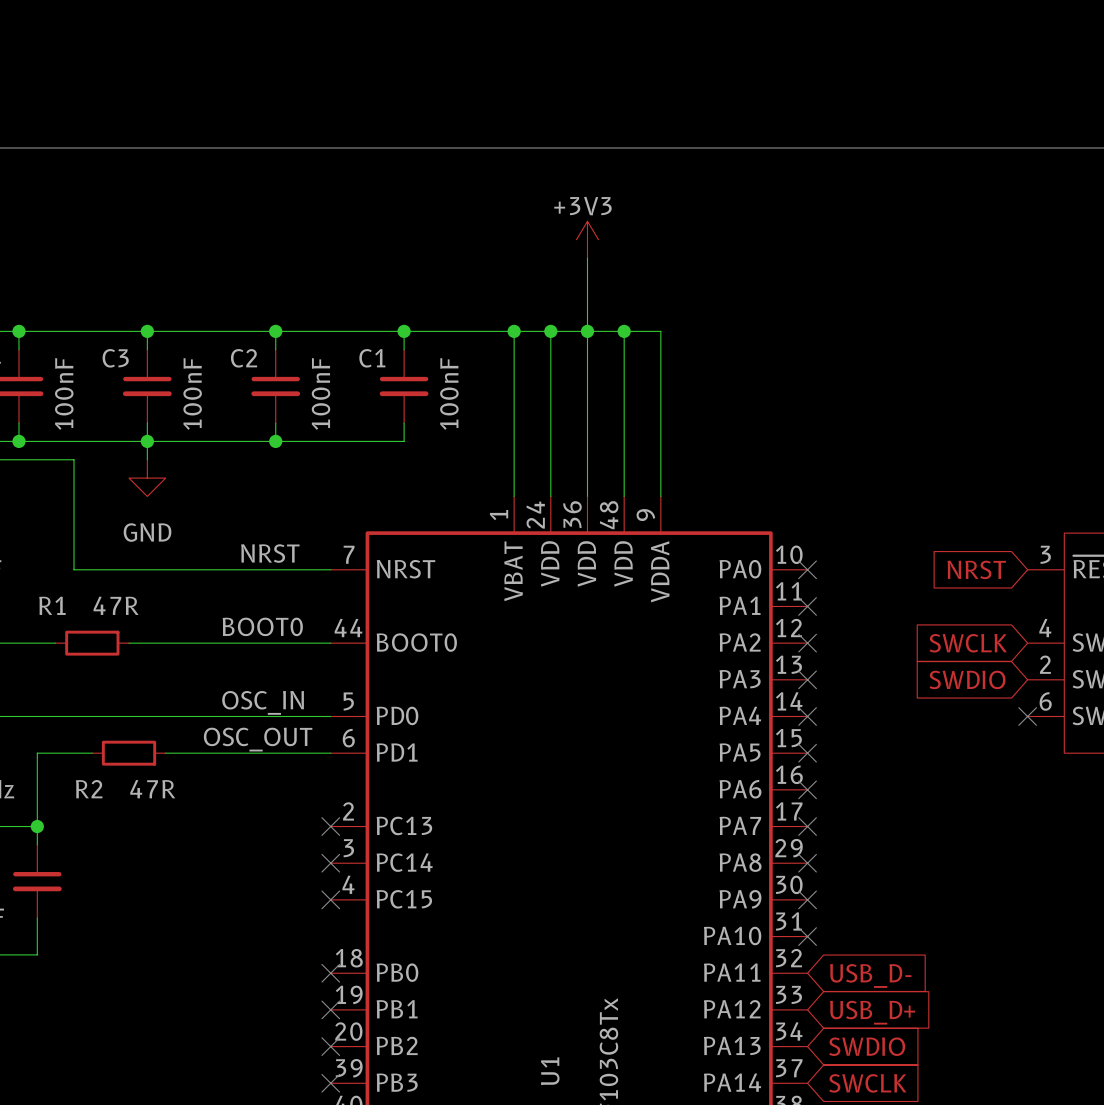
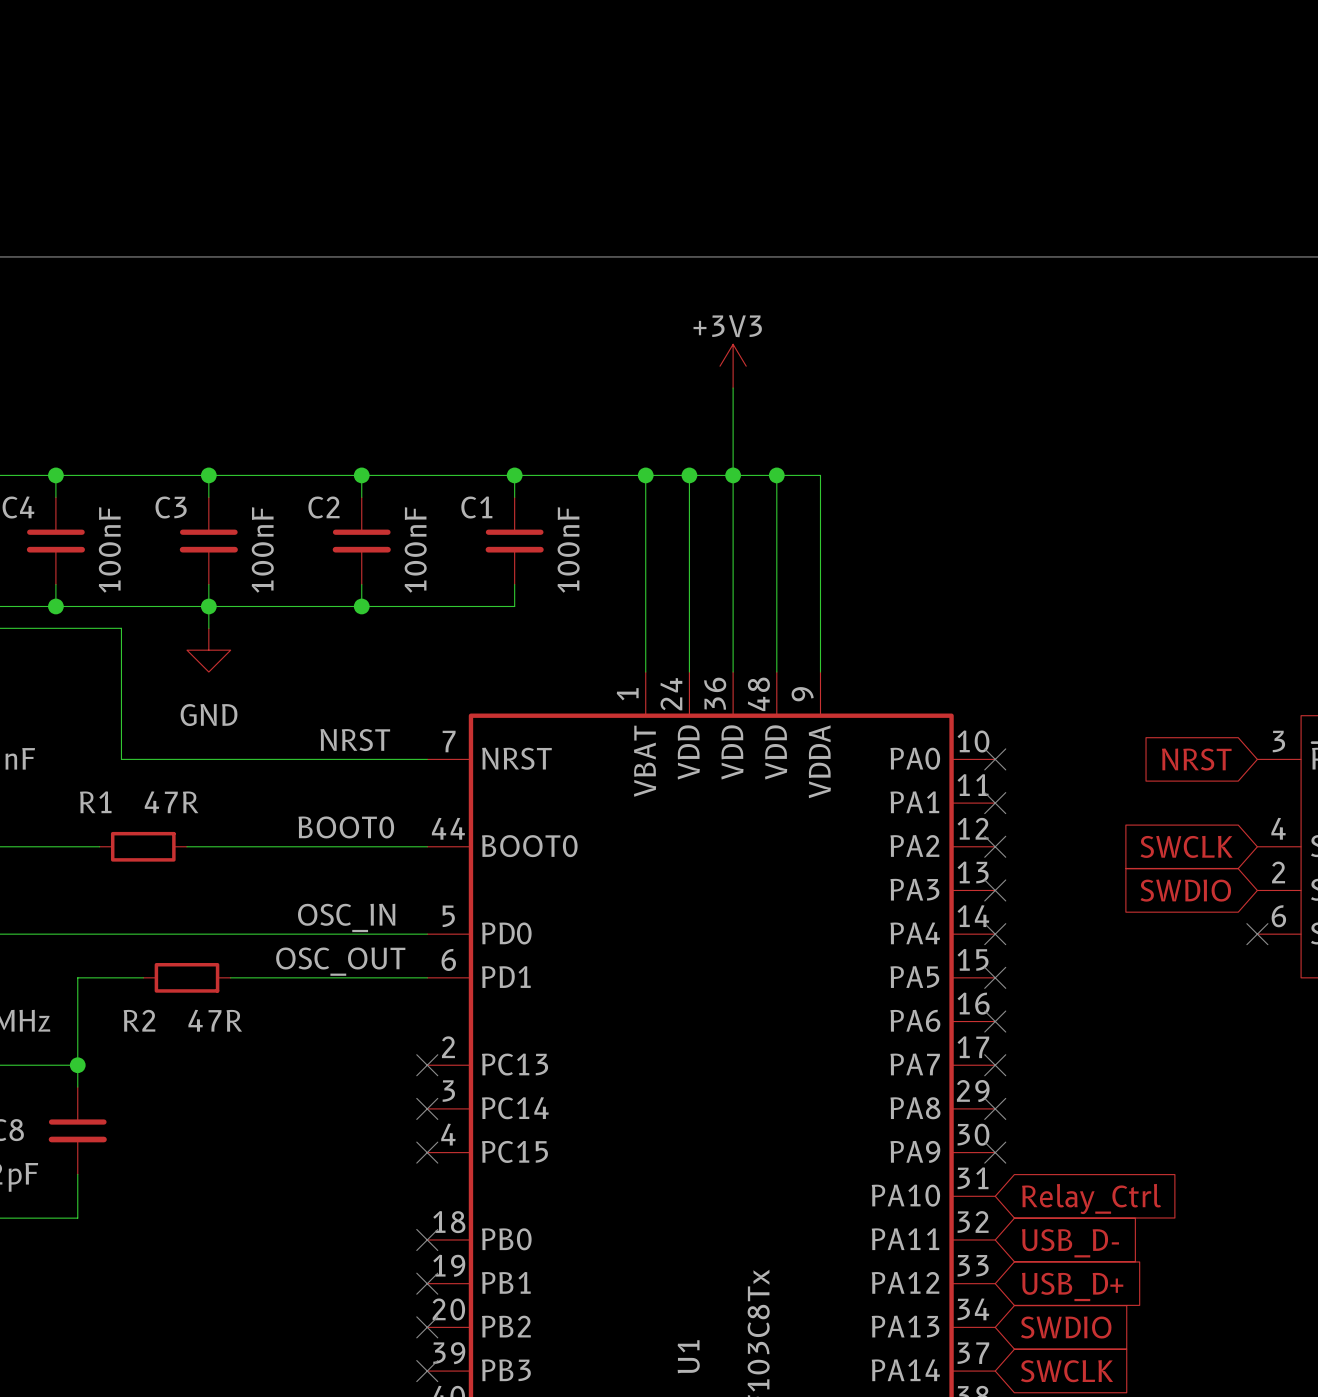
no-connect mark: (807, 936) -> none
global label: none -> Relay_Ctrl (1091, 1199)

